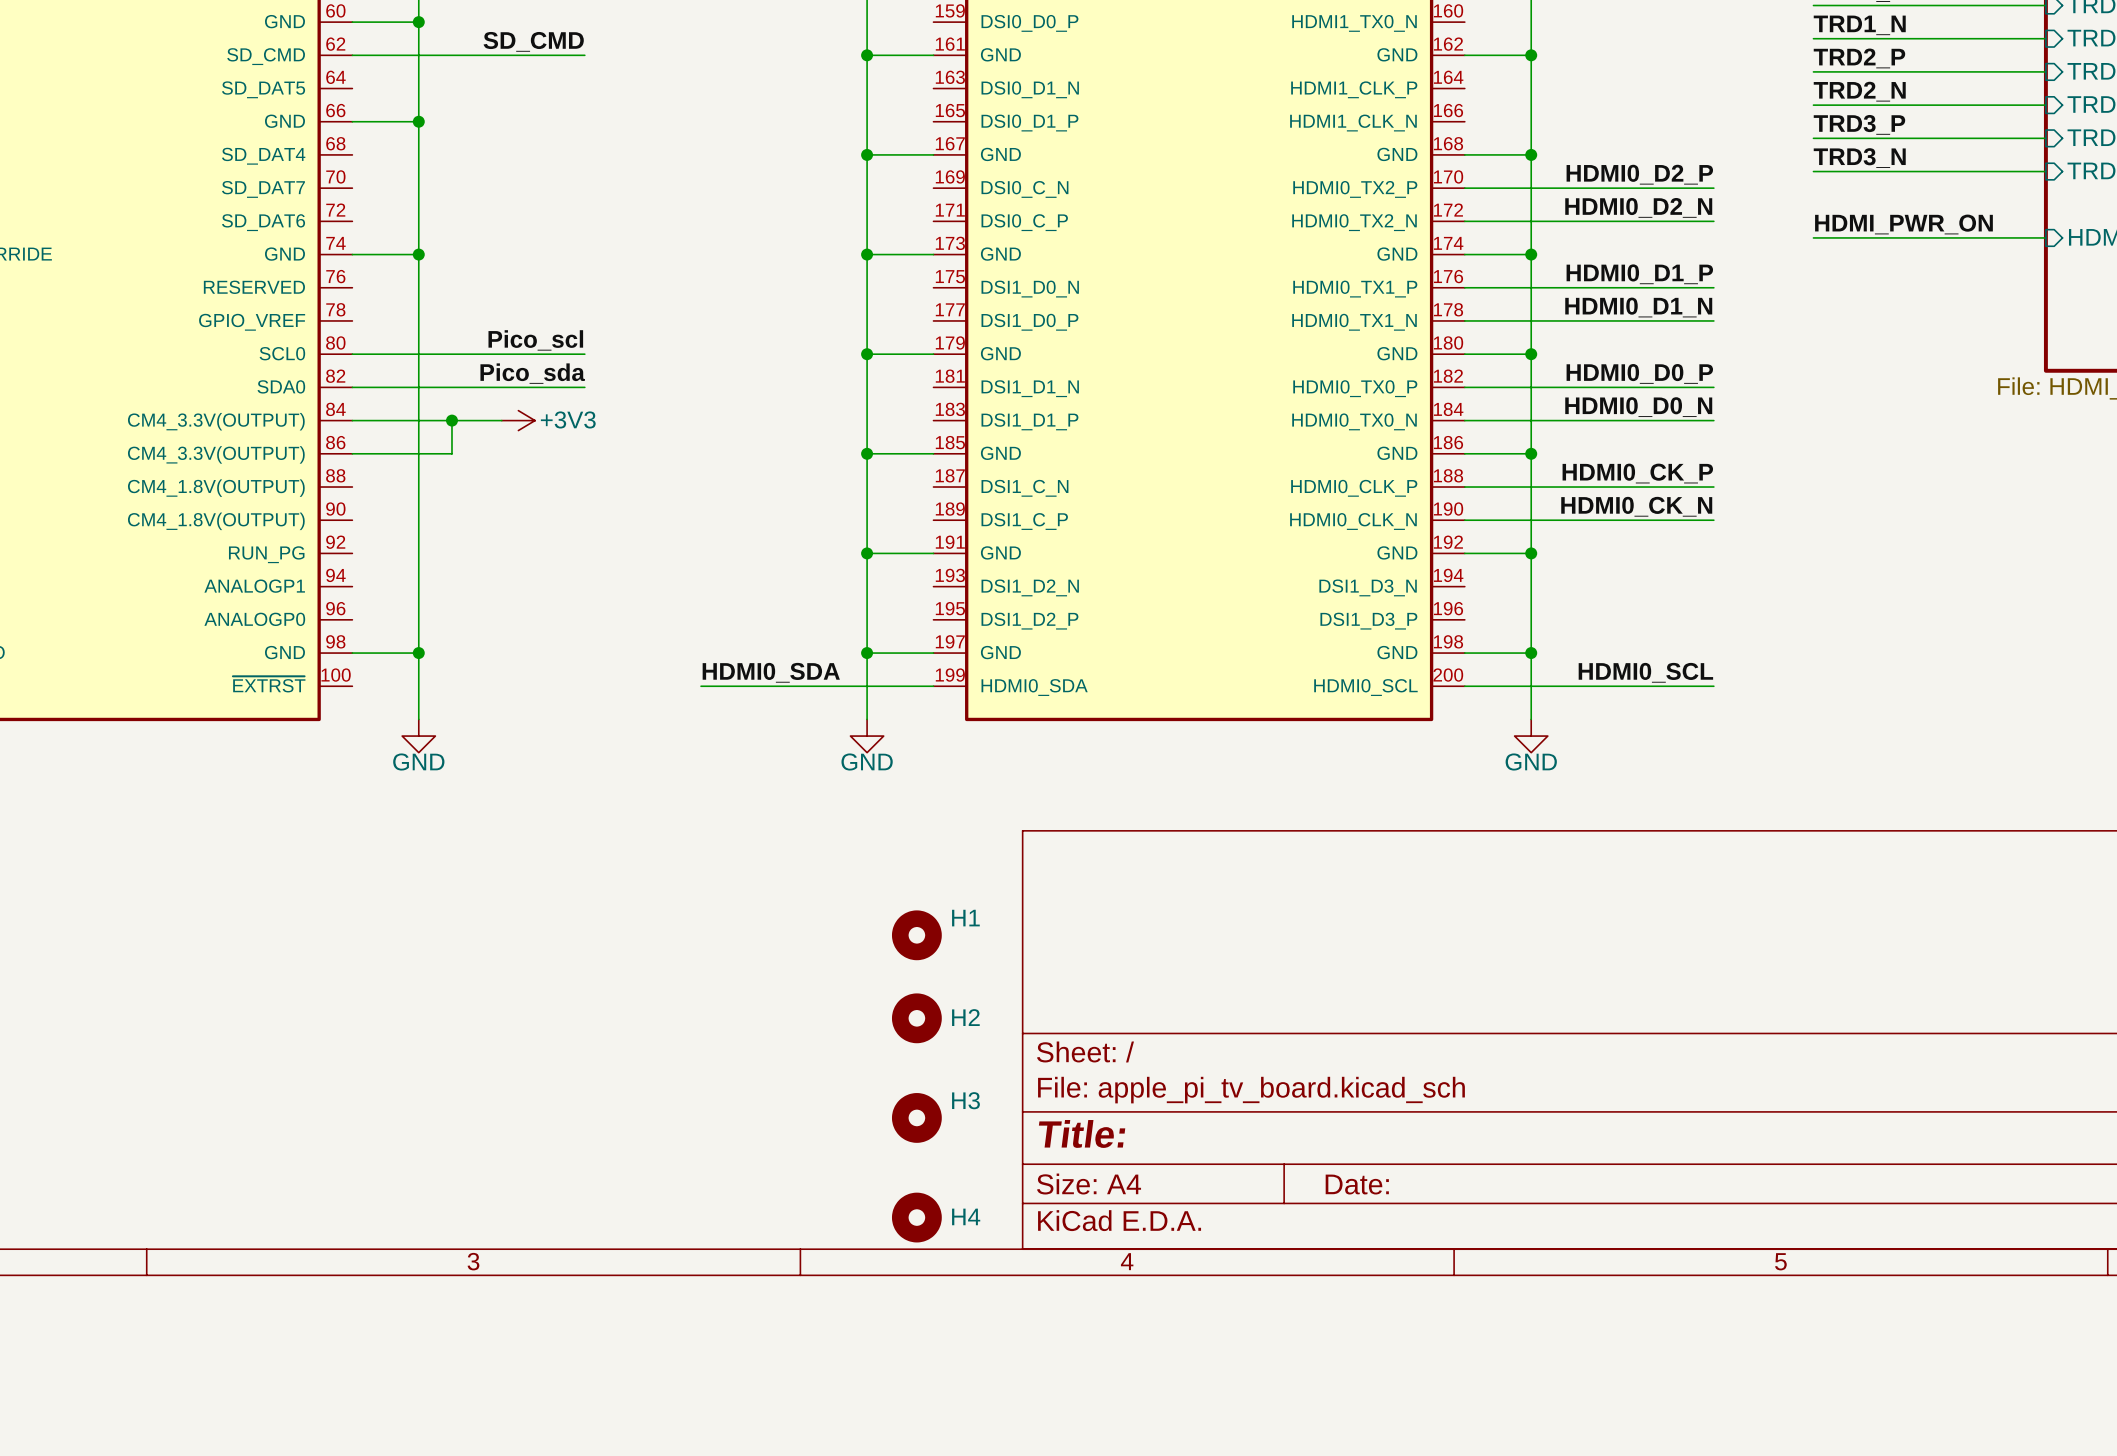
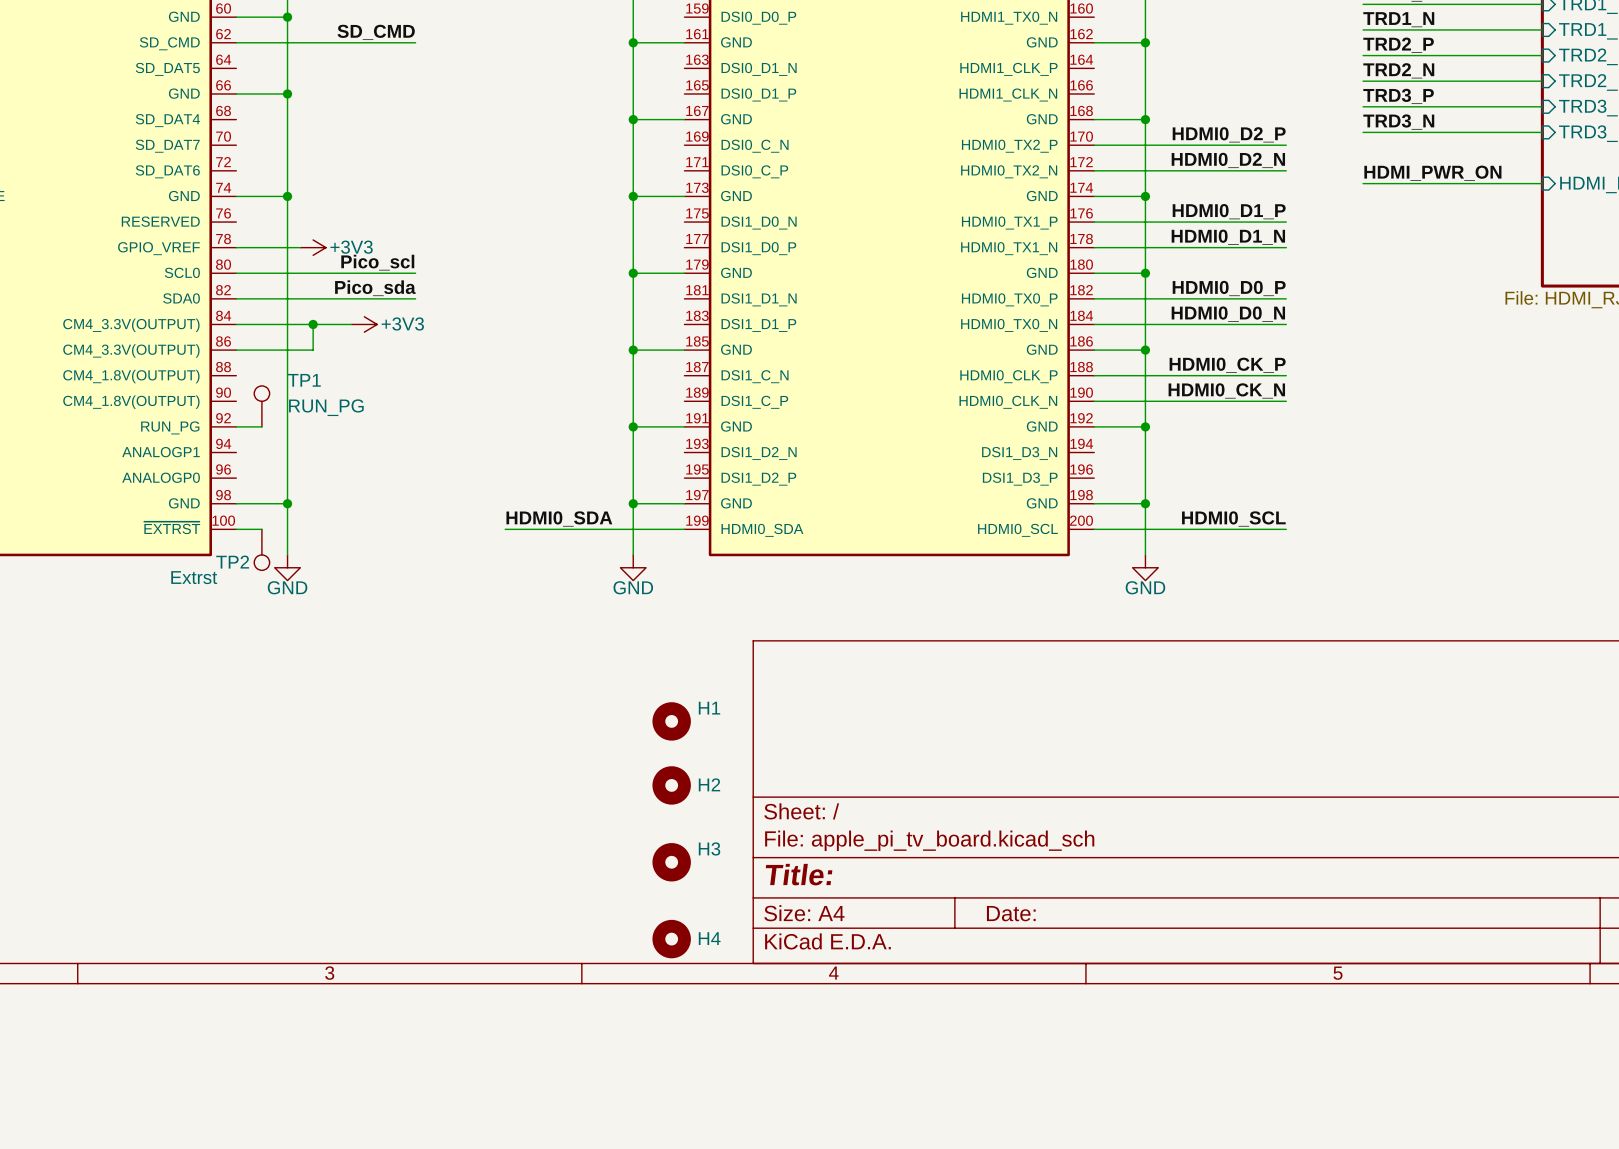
wire: none -> (236, 247) (300, 247)
power symbol: none -> +3V3 (313, 247)
TP1: none -> RUN_PG (261, 406)
wire: none -> (236, 426) (261, 426)
wire: none -> (236, 529) (261, 529)
TP2: none -> Extrst (261, 549)

